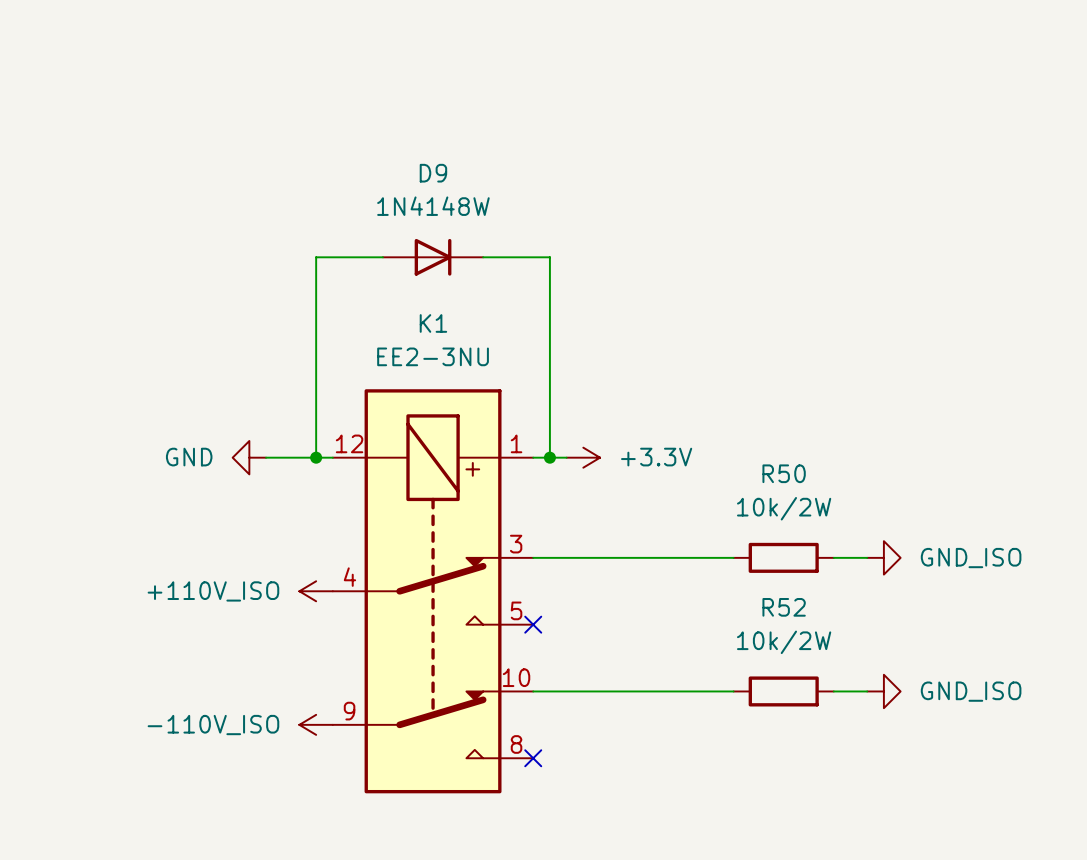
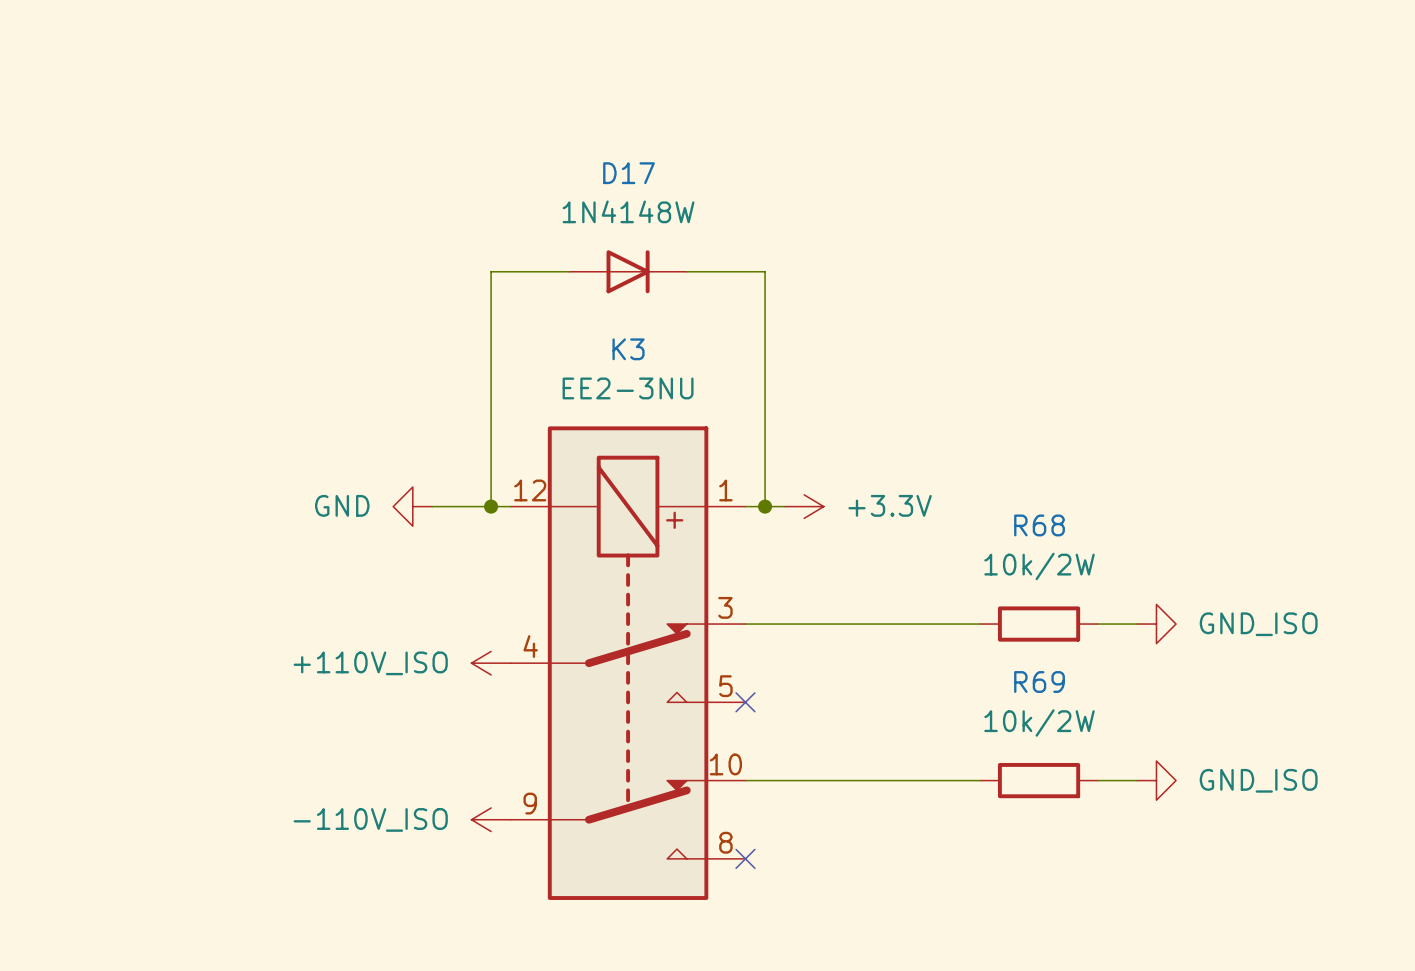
D9 name: D9 (433, 173) -> D17 (629, 173)
K1 name: K1 (433, 323) -> K3 (628, 349)
R50 name: R50 (784, 473) -> R68 (1039, 525)
R52 name: R52 (784, 607) -> R69 (1039, 682)

